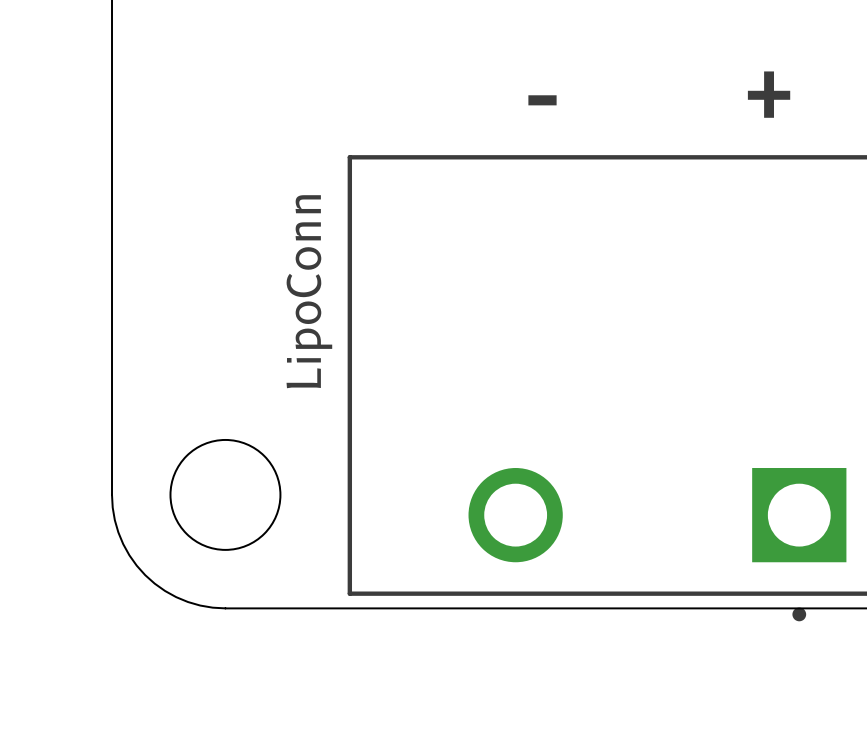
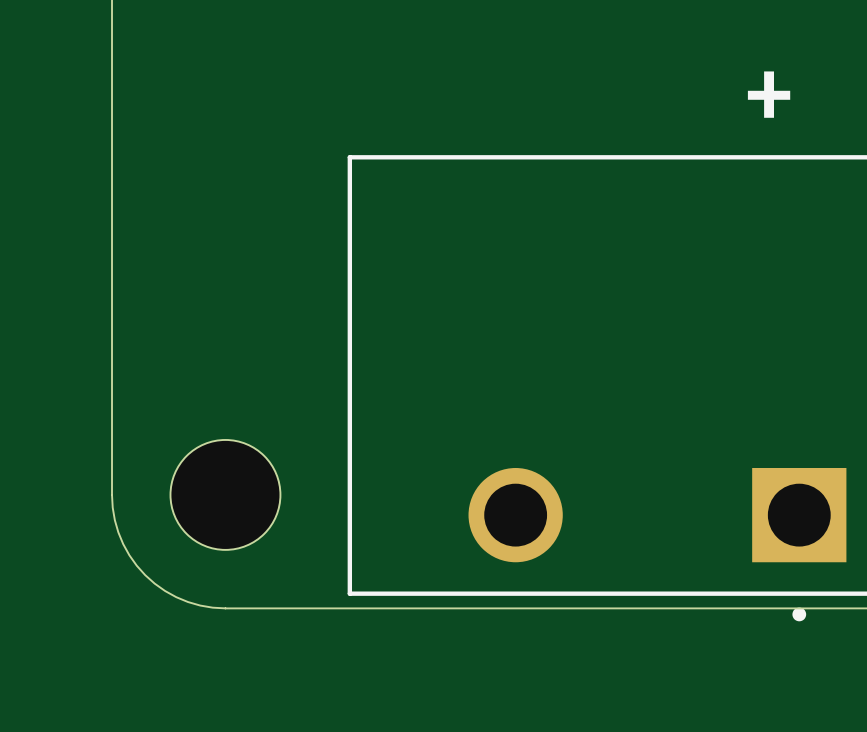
text: - (542, 100) -> none
text: LipoConn (309, 291) -> none

